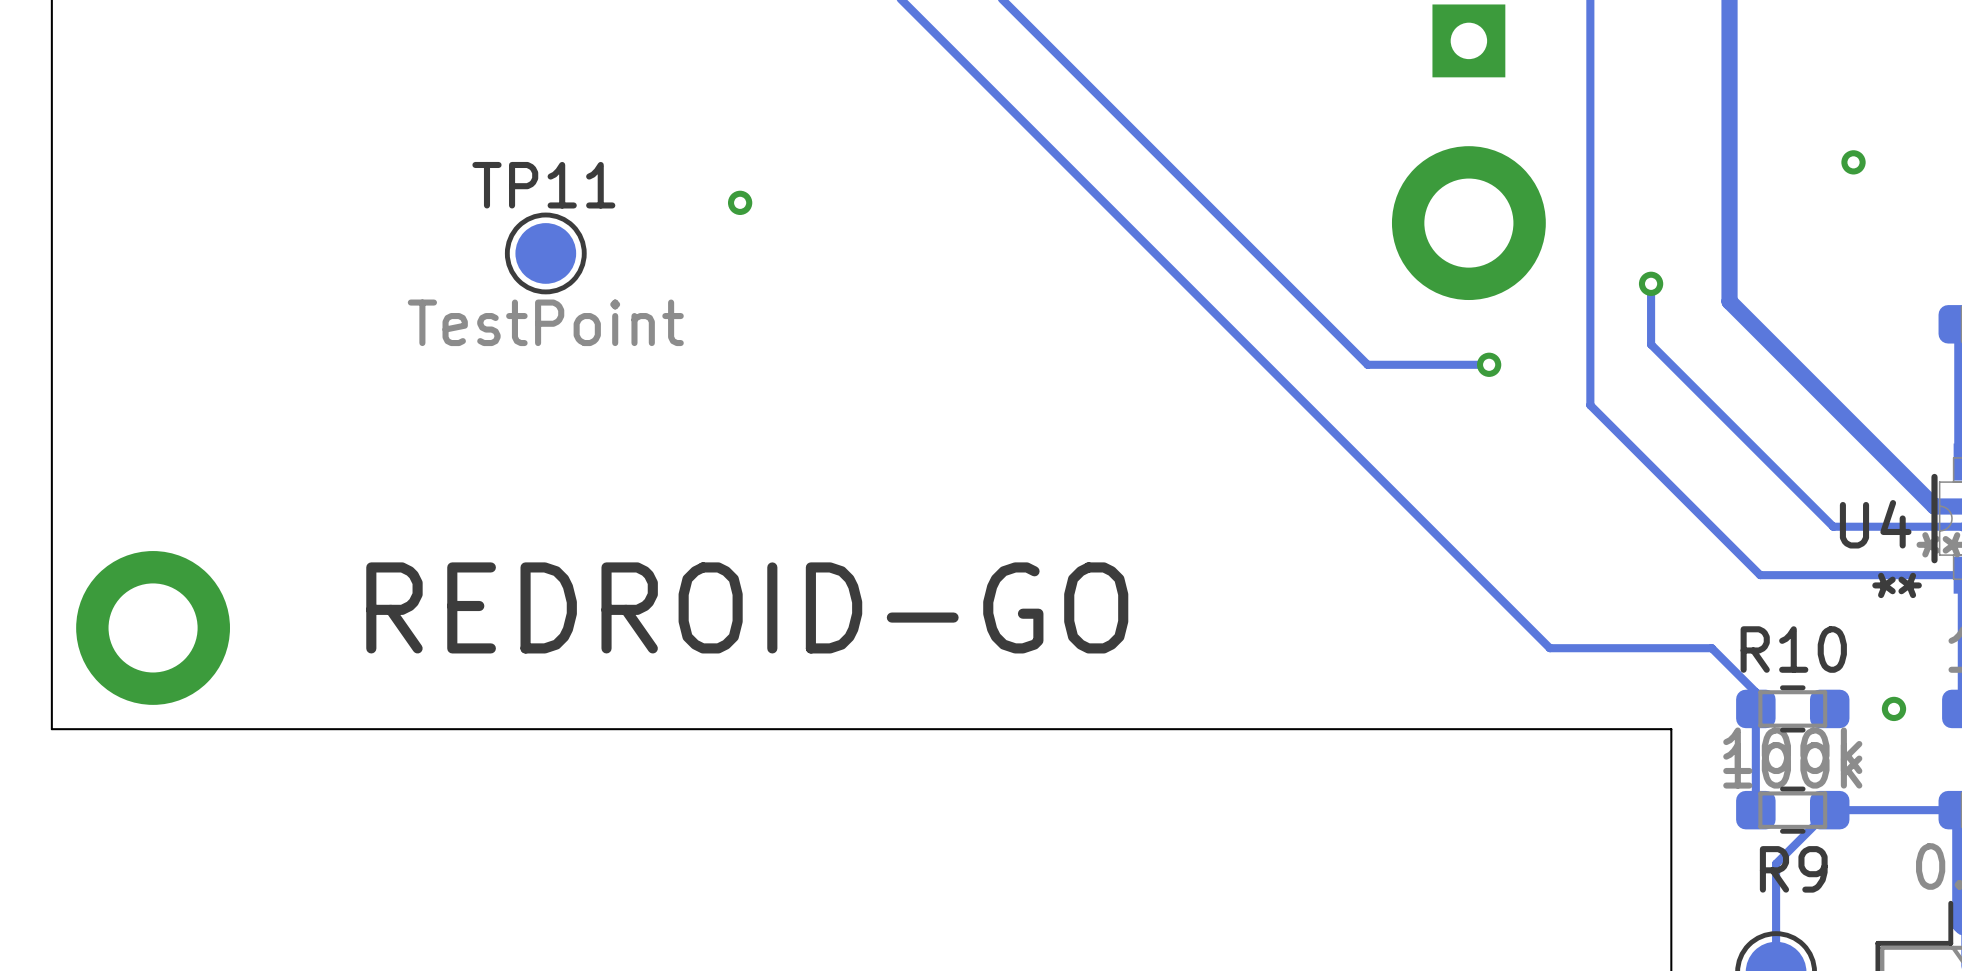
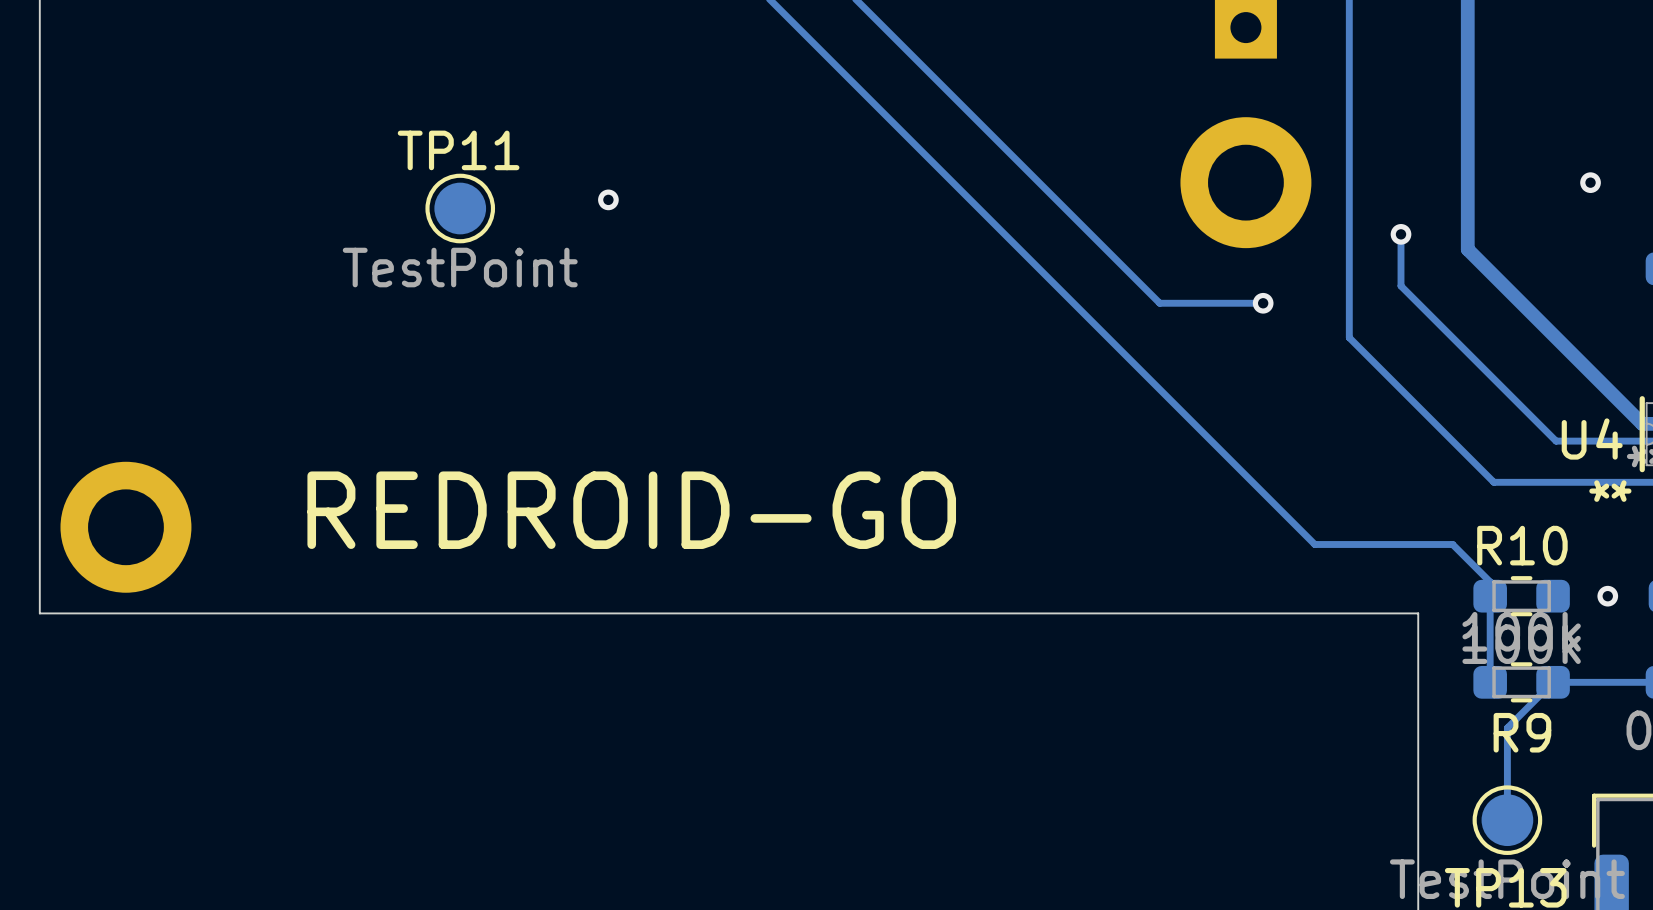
via position: (1853, 162) -> (1590, 182)
via position: (740, 202) -> (608, 199)

